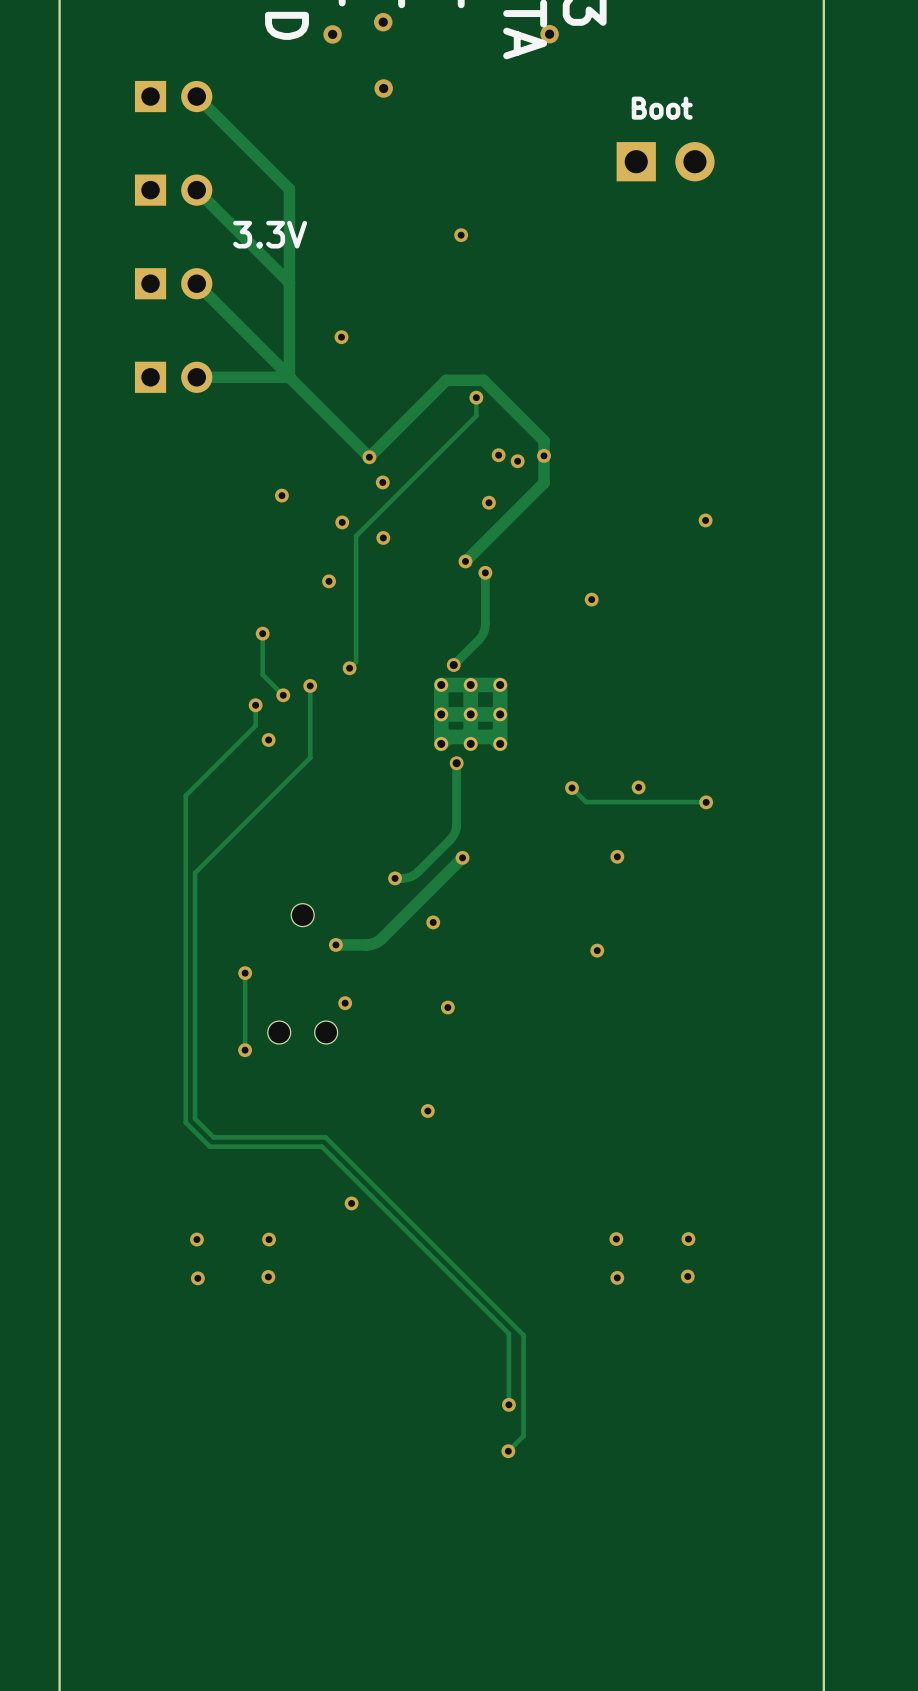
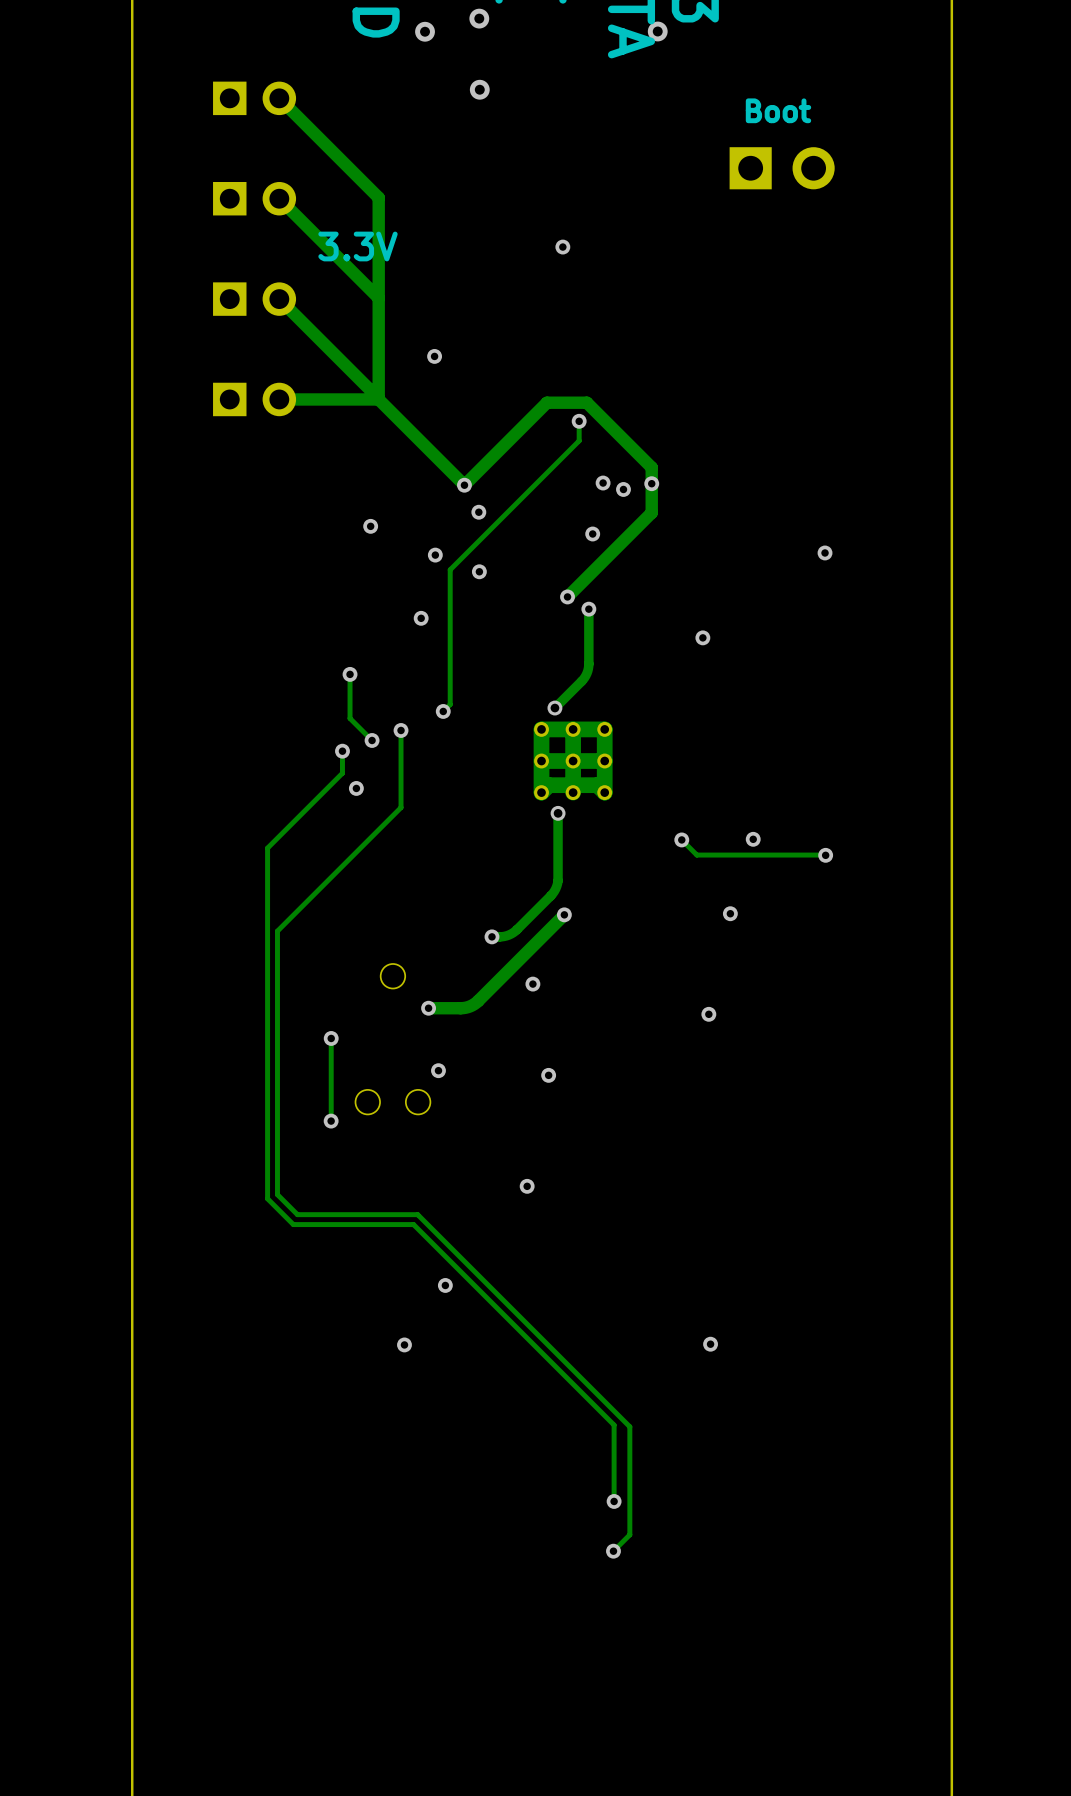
via: (196, 1239) -> none
via: (269, 1239) -> none
via: (616, 1239) -> none
via: (688, 1239) -> none
via: none -> (404, 1344)
via: none -> (710, 1344)
via: (268, 1276) -> none
via: (687, 1276) -> none
via: (617, 1277) -> none
via: (197, 1278) -> none

